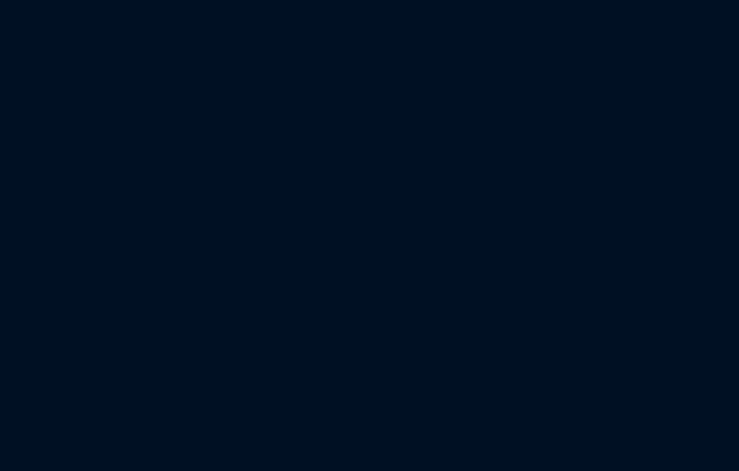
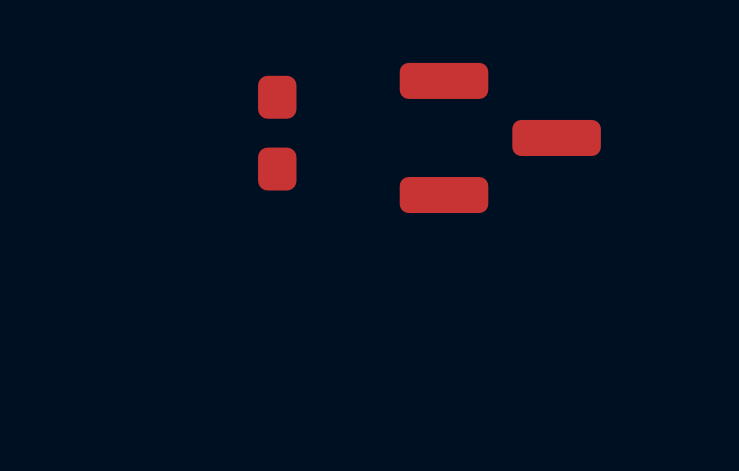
part: none -> (277, 133)
part: none -> (500, 137)

